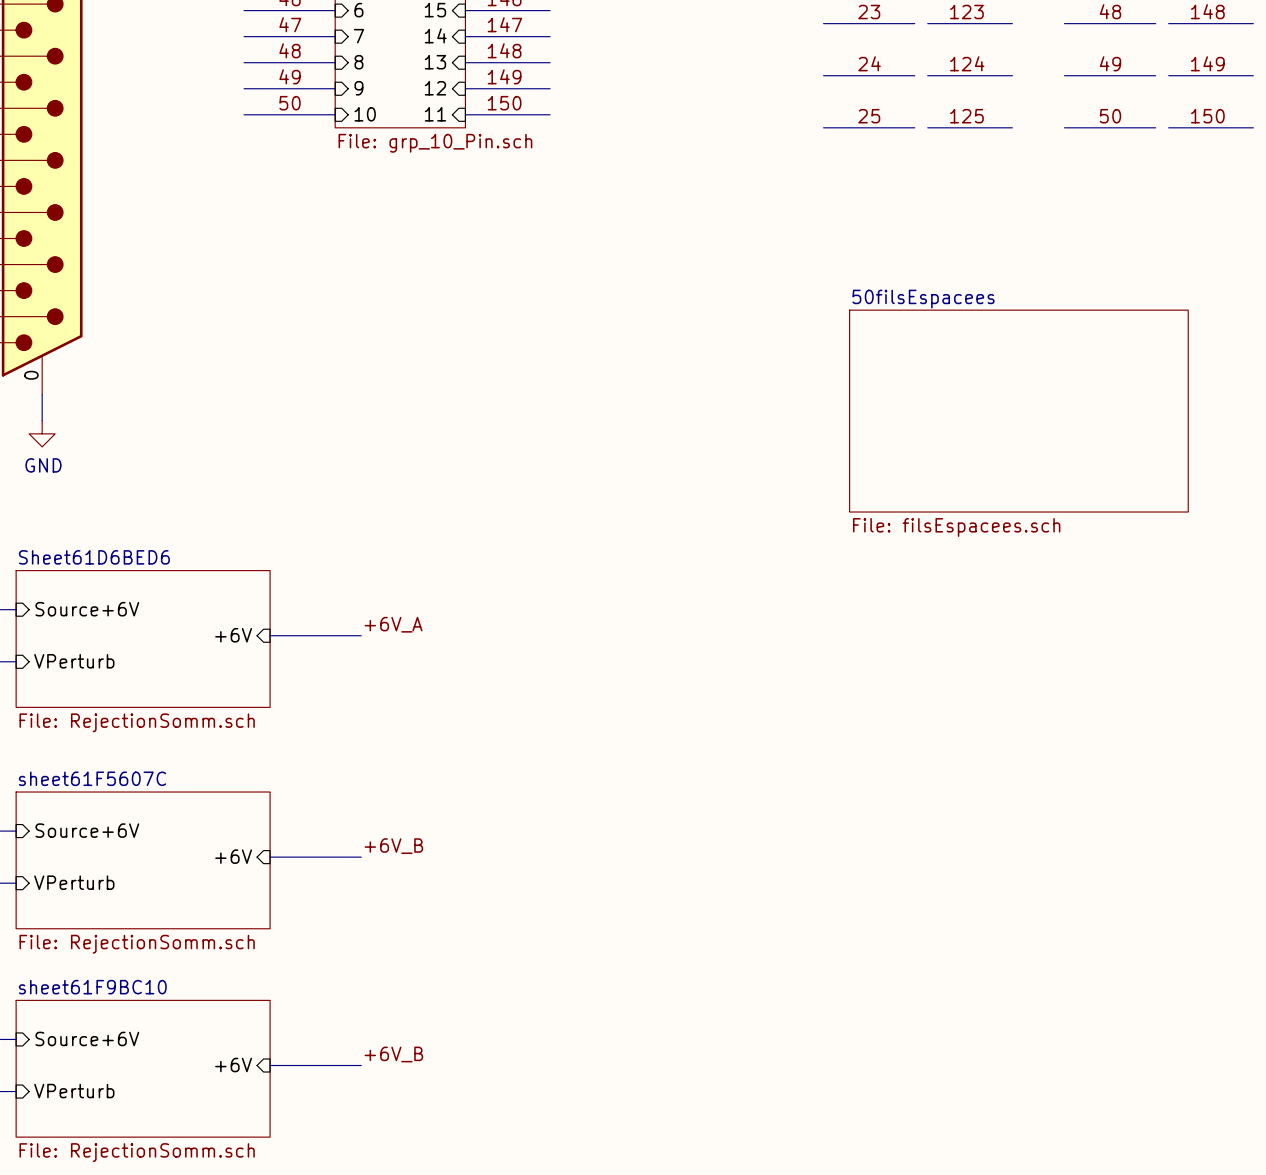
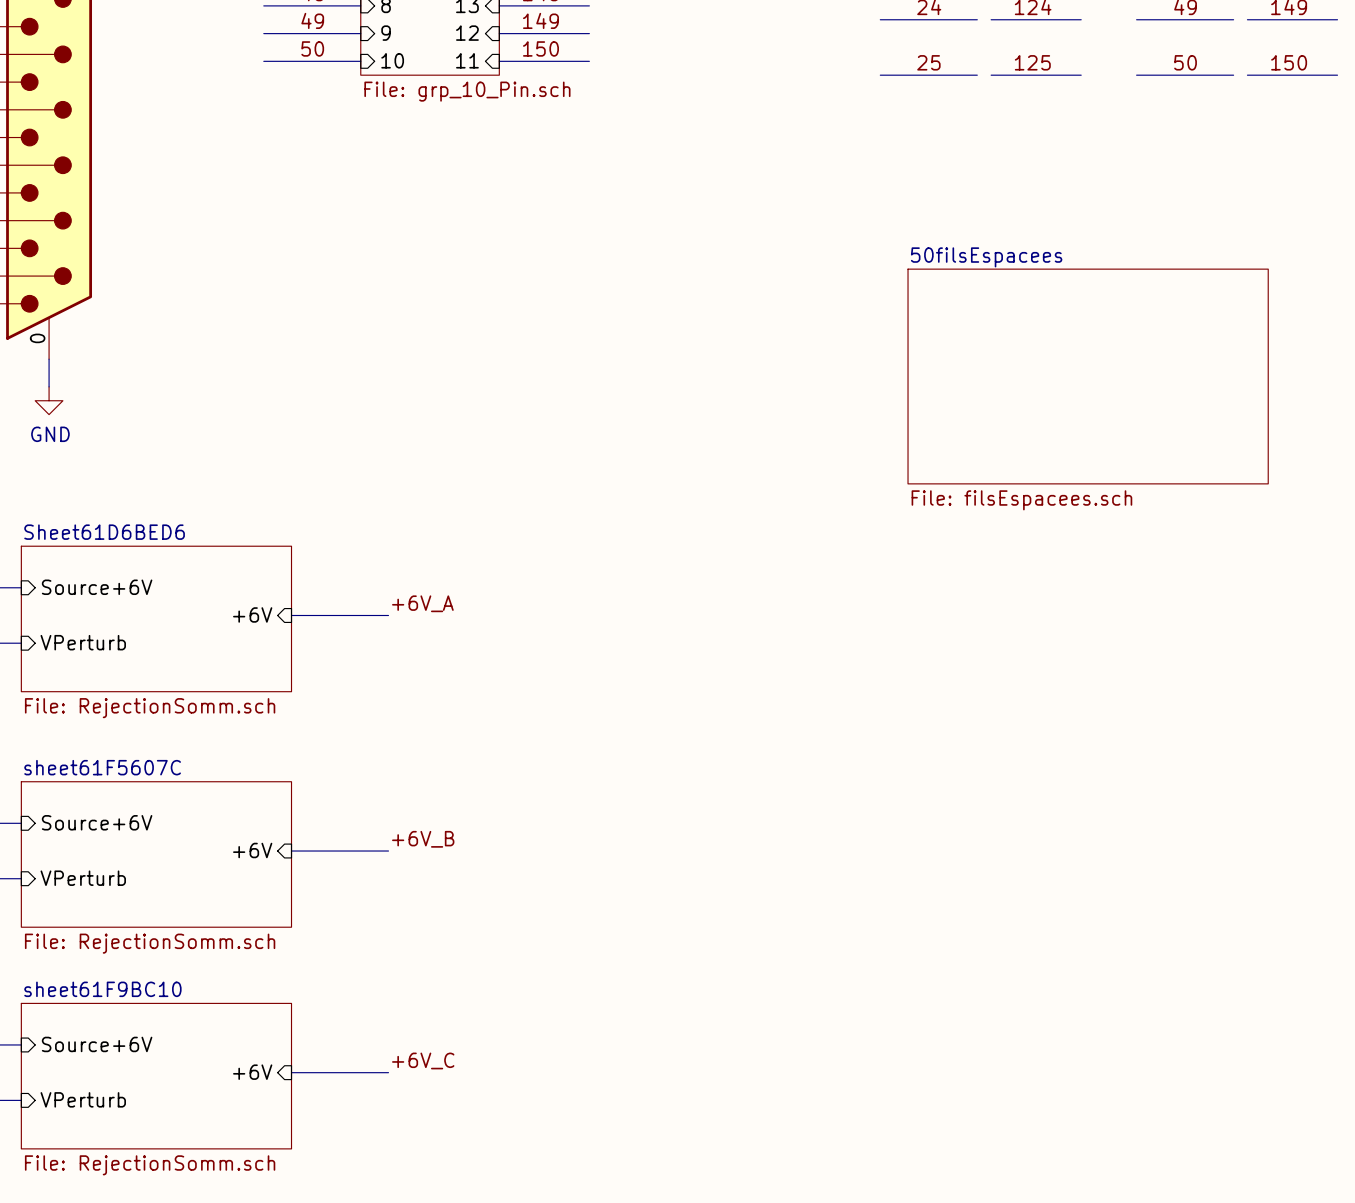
label: +6V_B (393, 1054) -> +6V_C (423, 1060)

